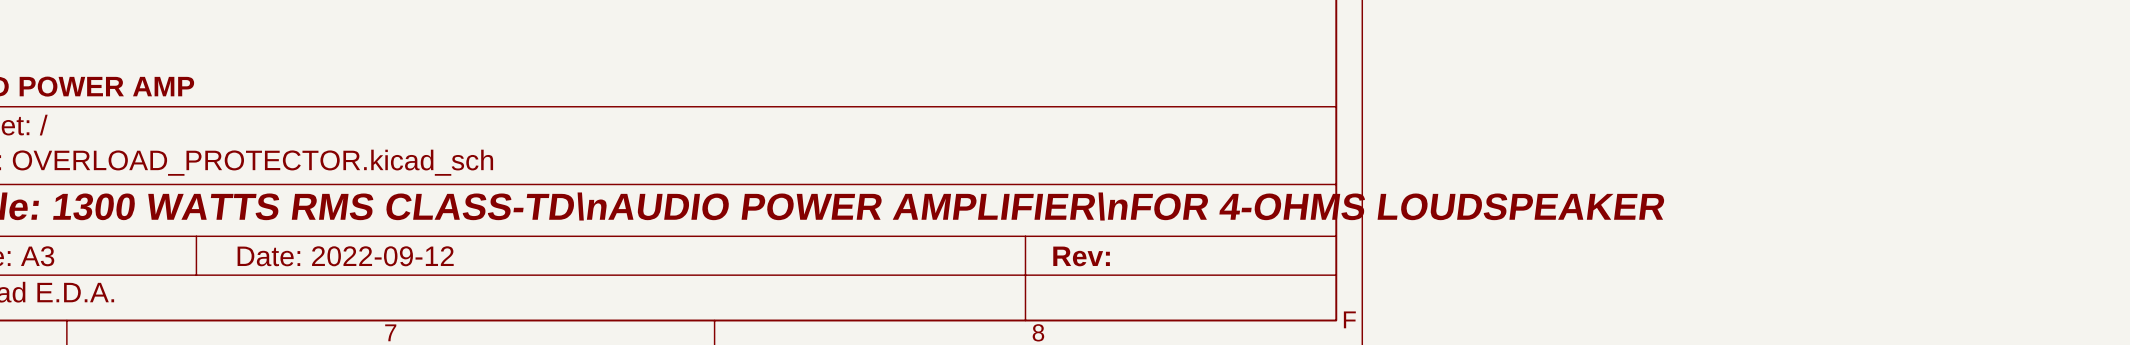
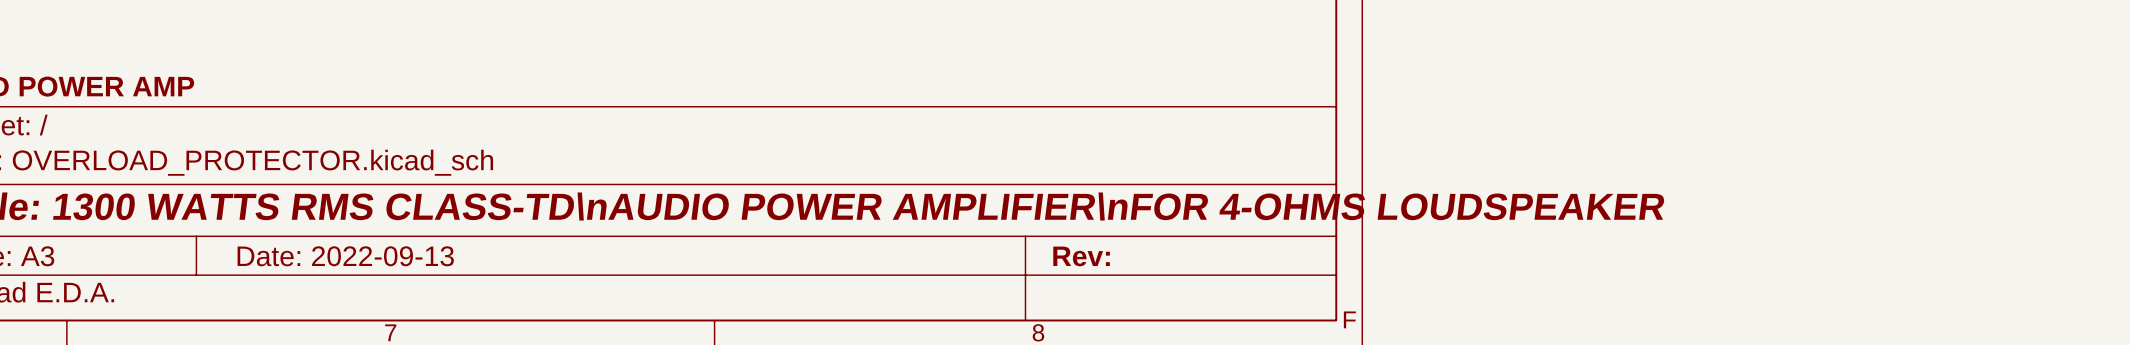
title block: Date: 2022-09-12 (345, 256) -> Date: 2022-09-13 (345, 256)

